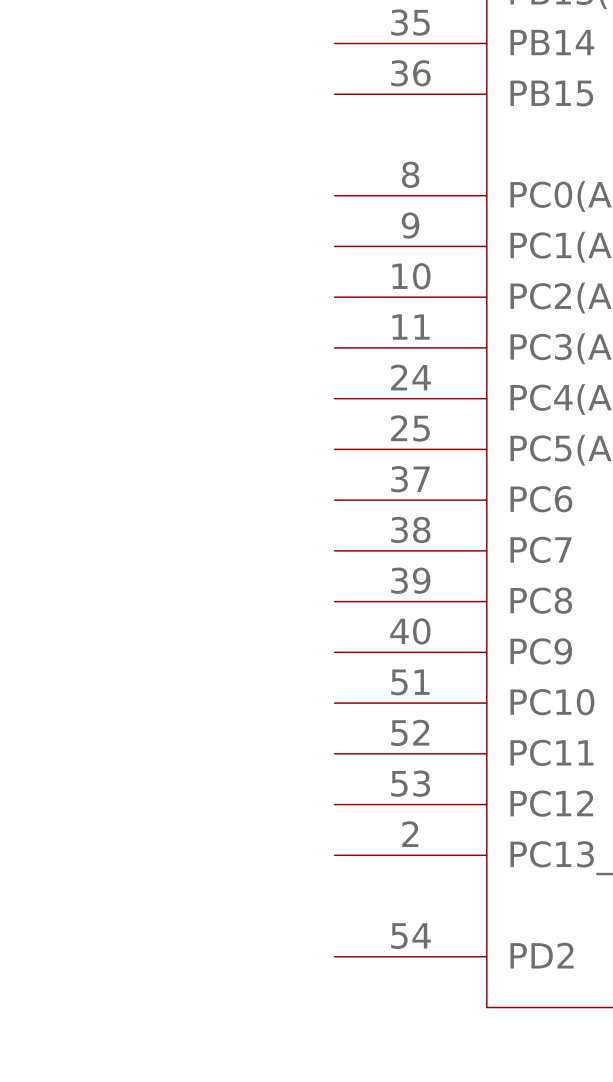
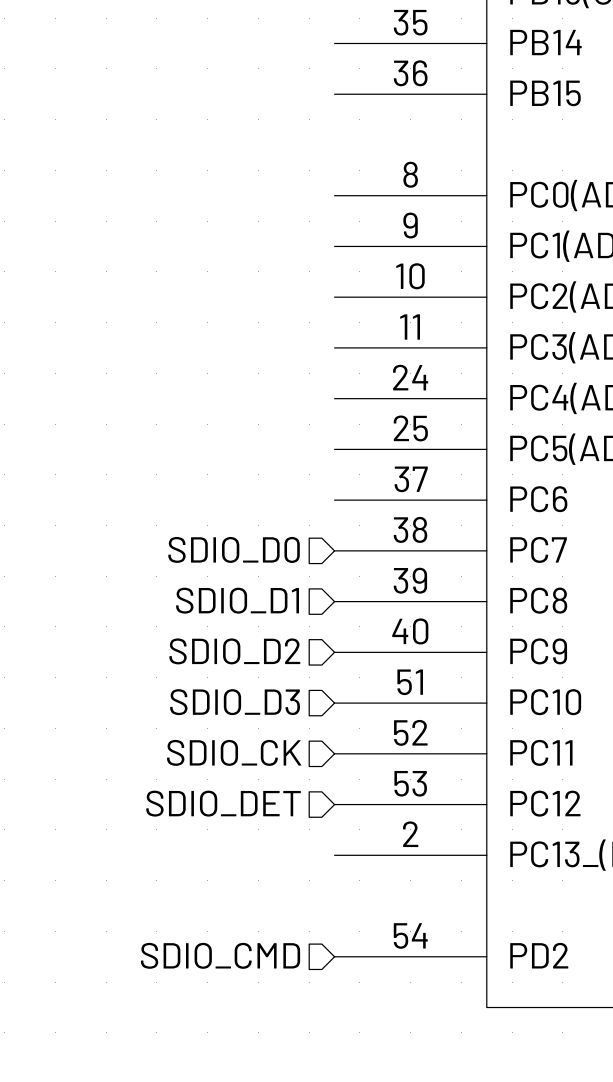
hierarchical label: none -> SDIO_D0 (234, 549)
hierarchical label: none -> SDIO_D1 (237, 600)
hierarchical label: none -> SDIO_D2 (234, 651)
hierarchical label: none -> SDIO_D3 (235, 702)
hierarchical label: none -> SDIO_CK (234, 752)
hierarchical label: none -> SDIO_DET (223, 803)
hierarchical label: none -> SDIO_CMD (220, 955)

